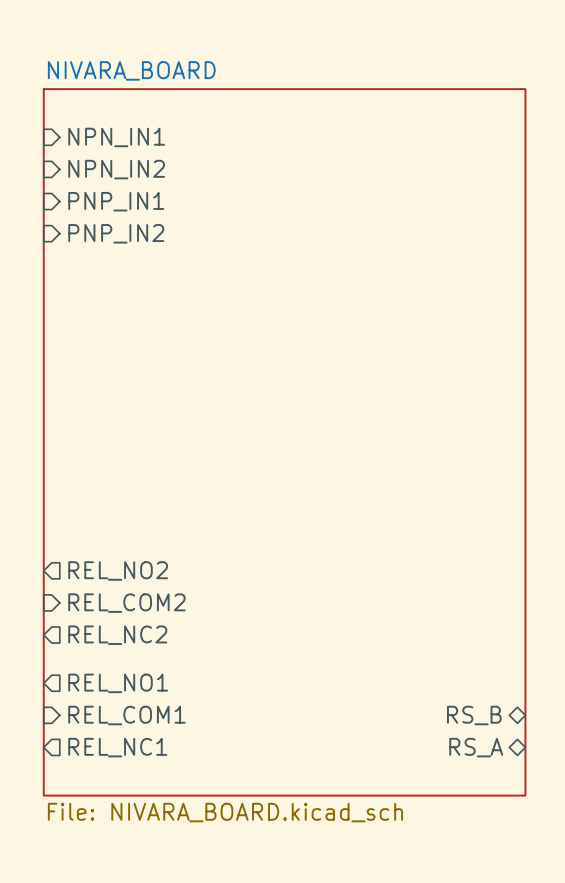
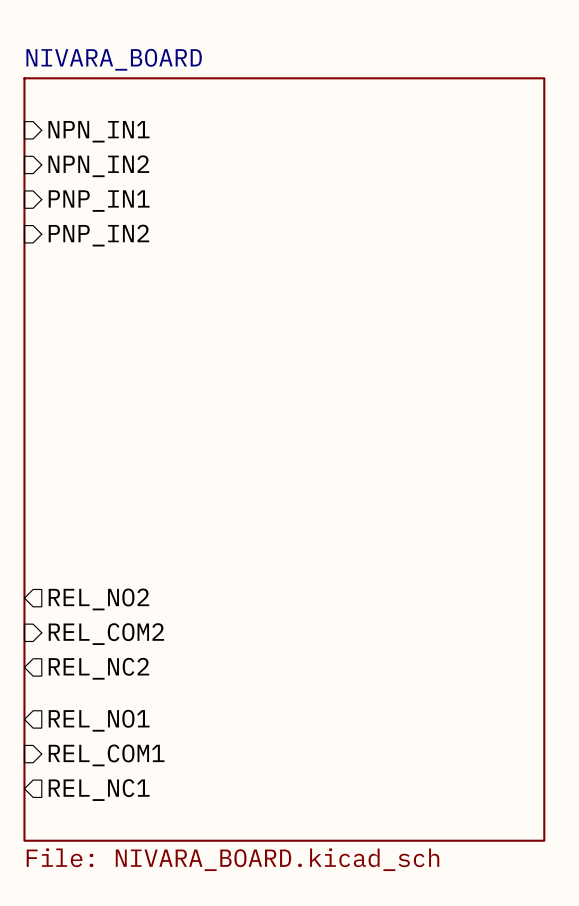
sheet pin: RS_B (474, 715) -> none
sheet pin: RS_A (476, 747) -> none

